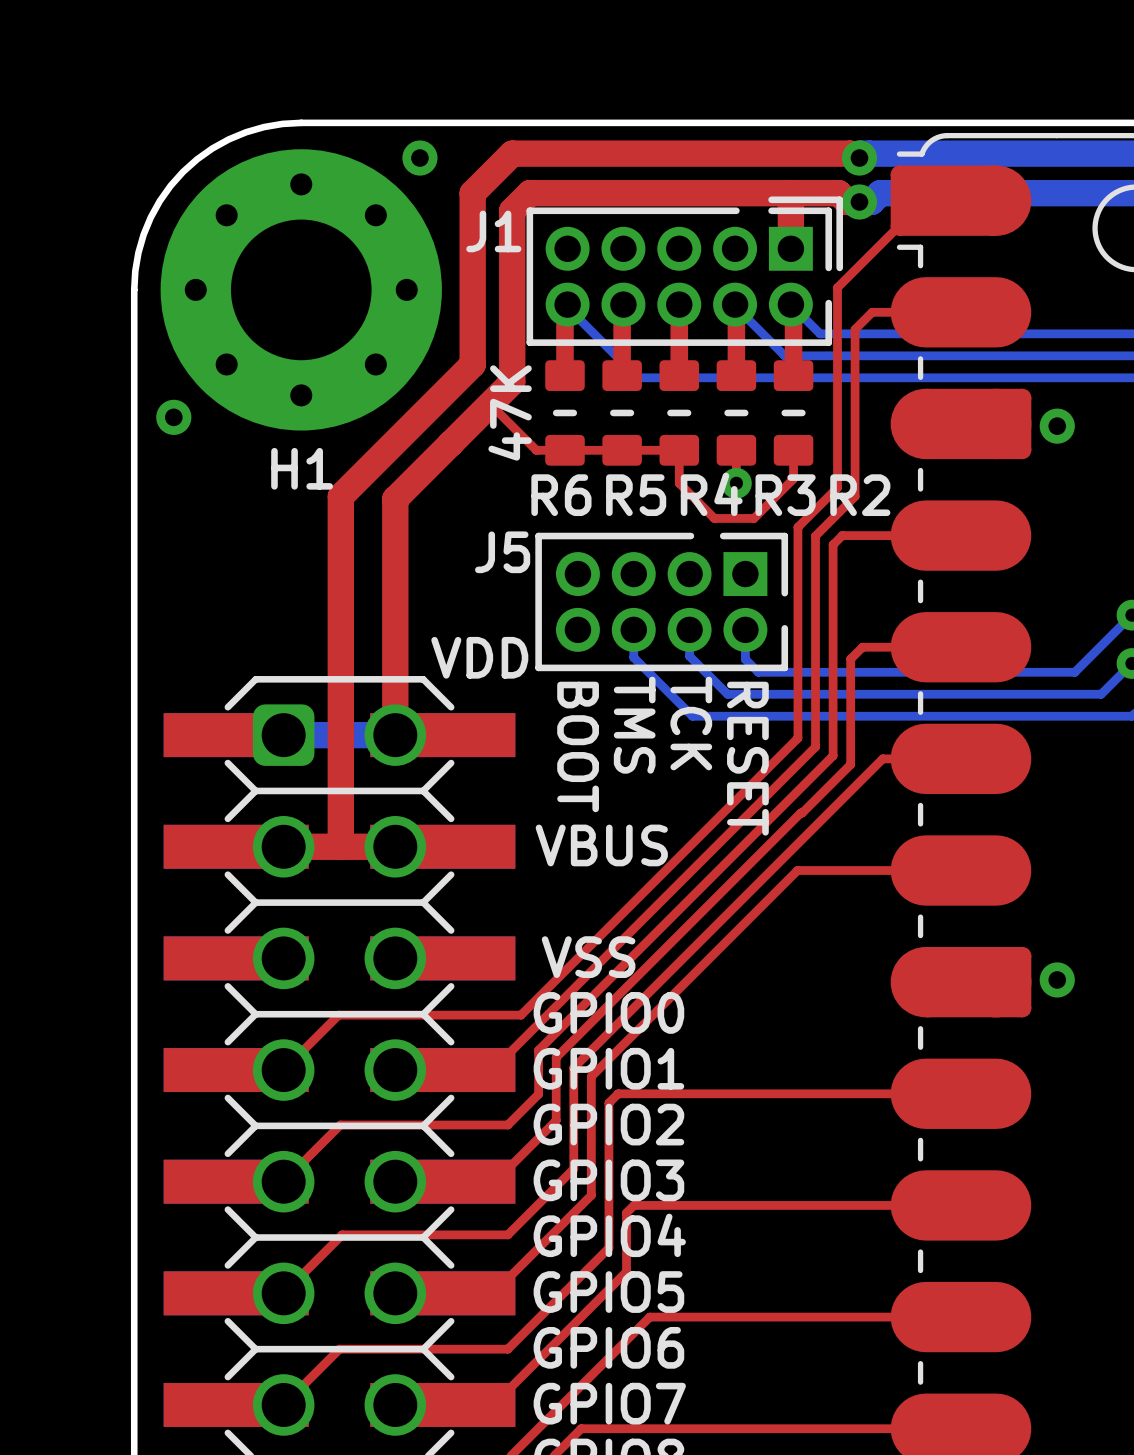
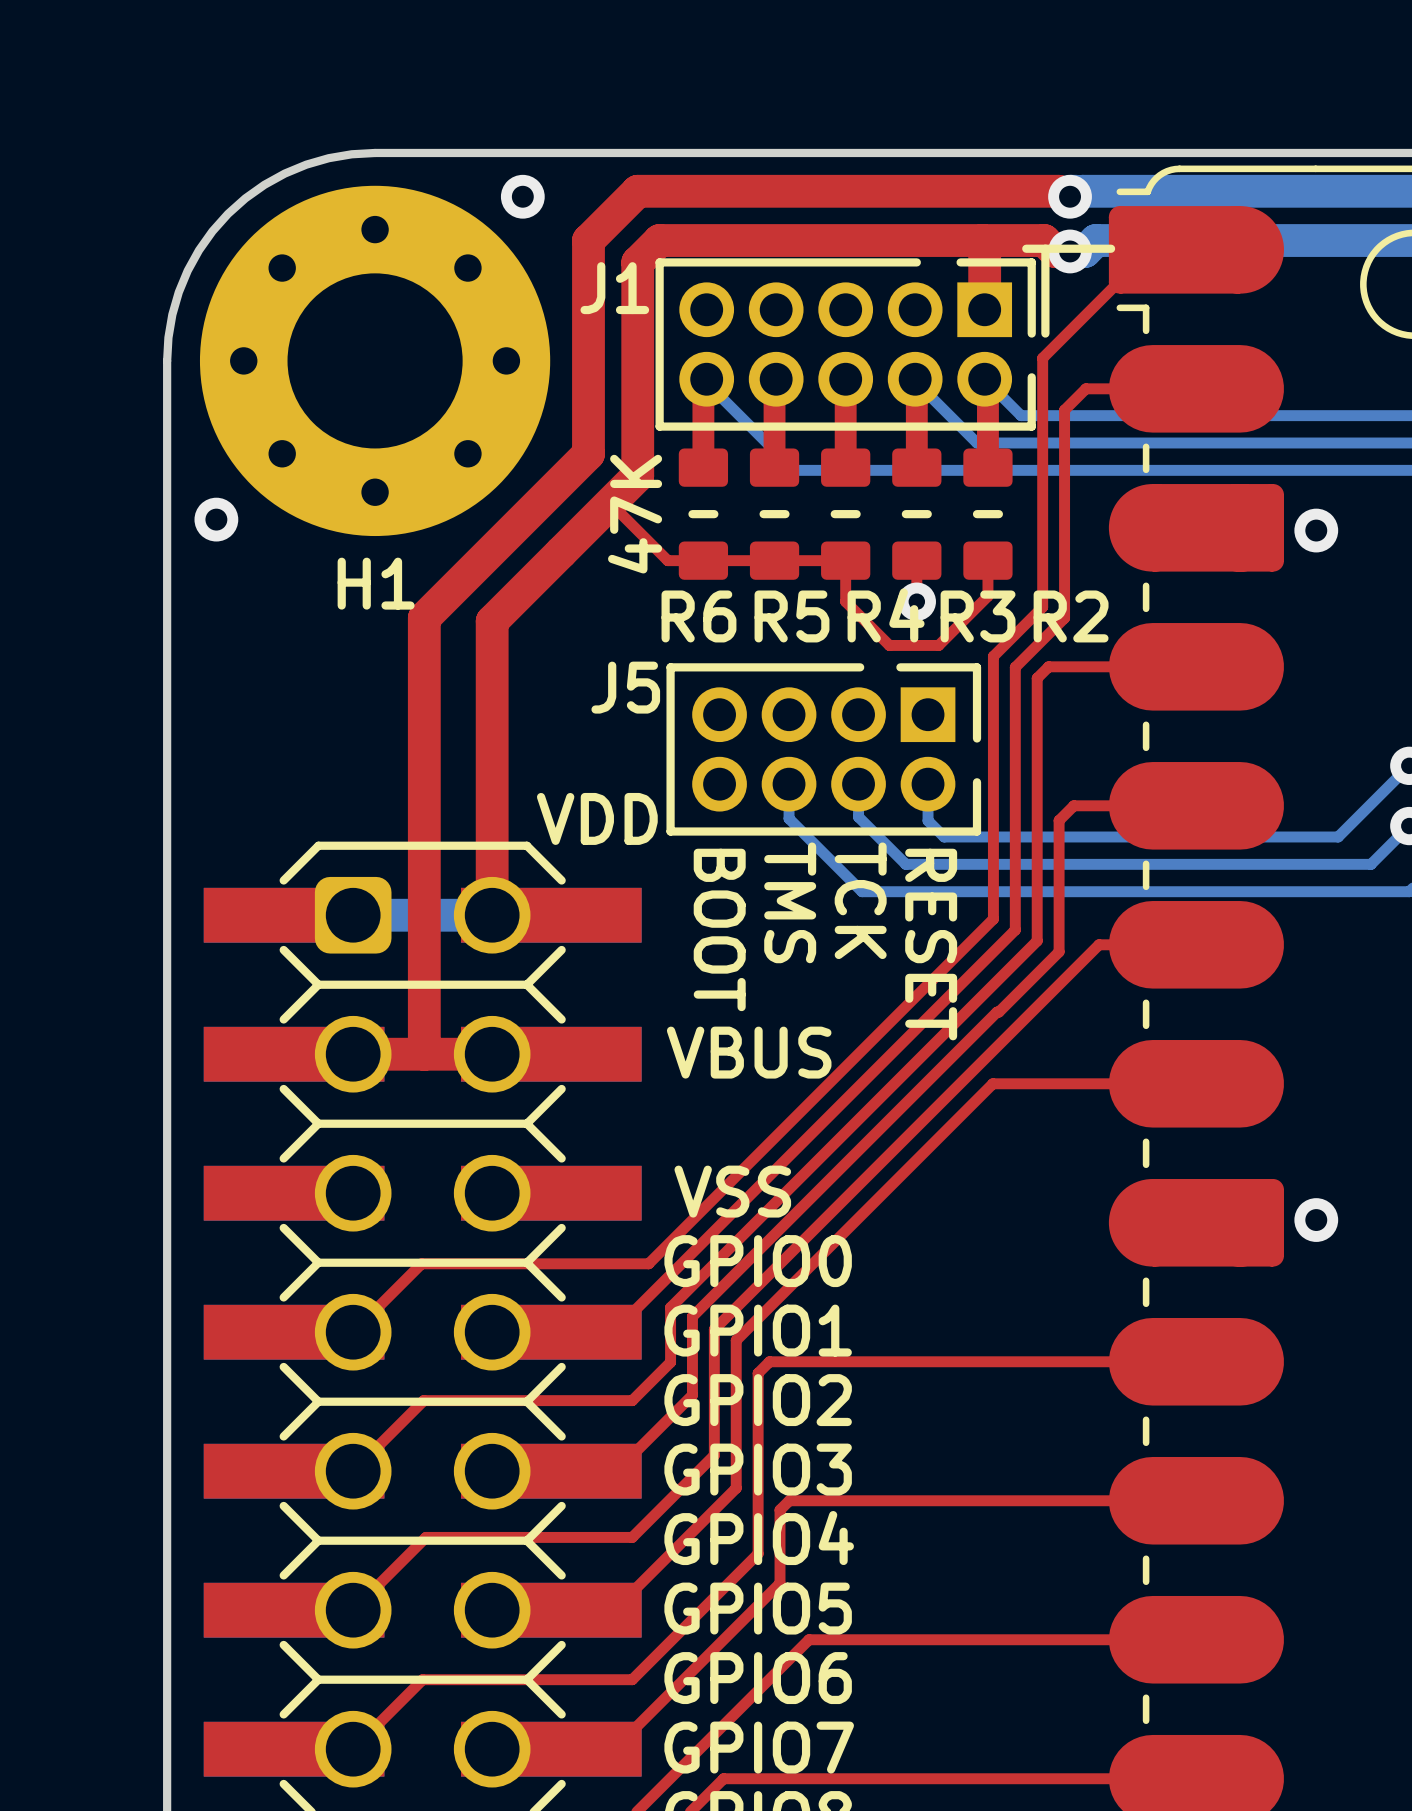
line: (771, 199) (824, 199) -> (1045, 248) (1111, 248)

